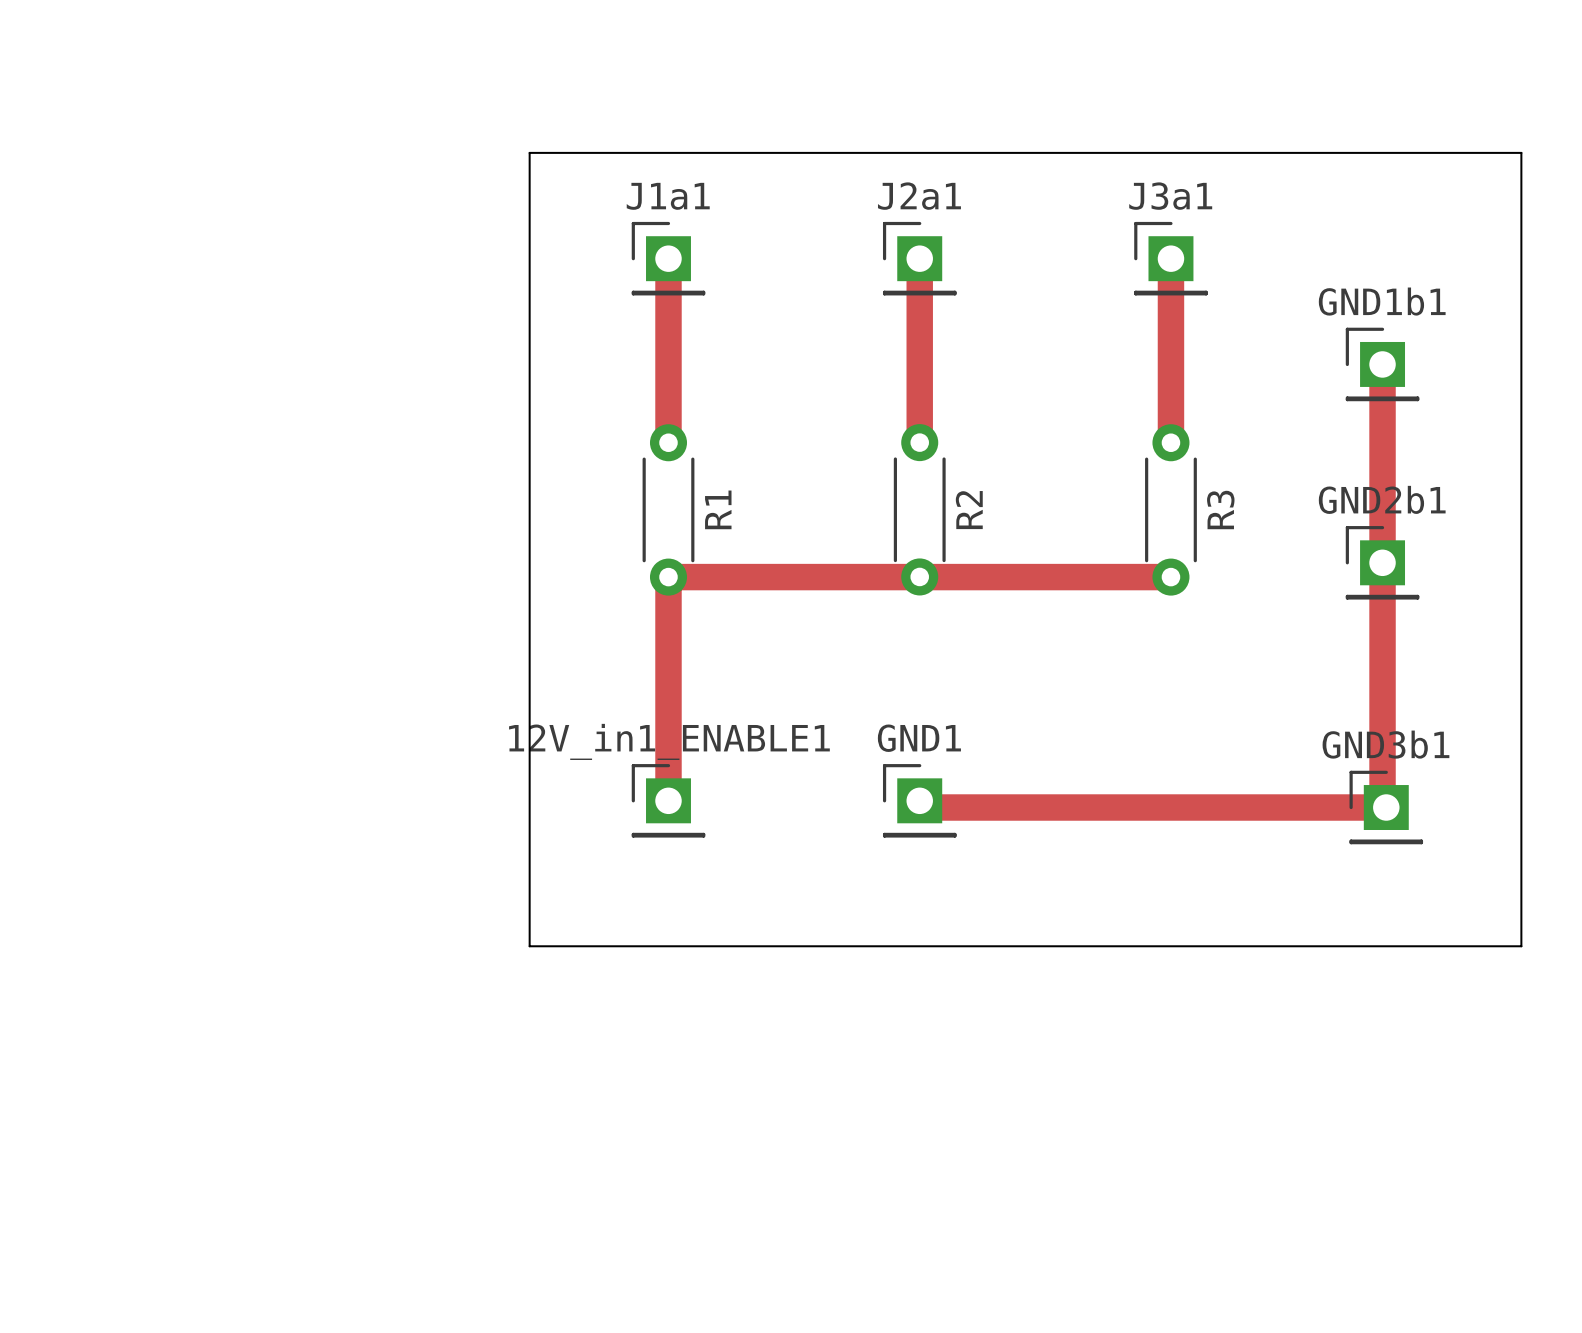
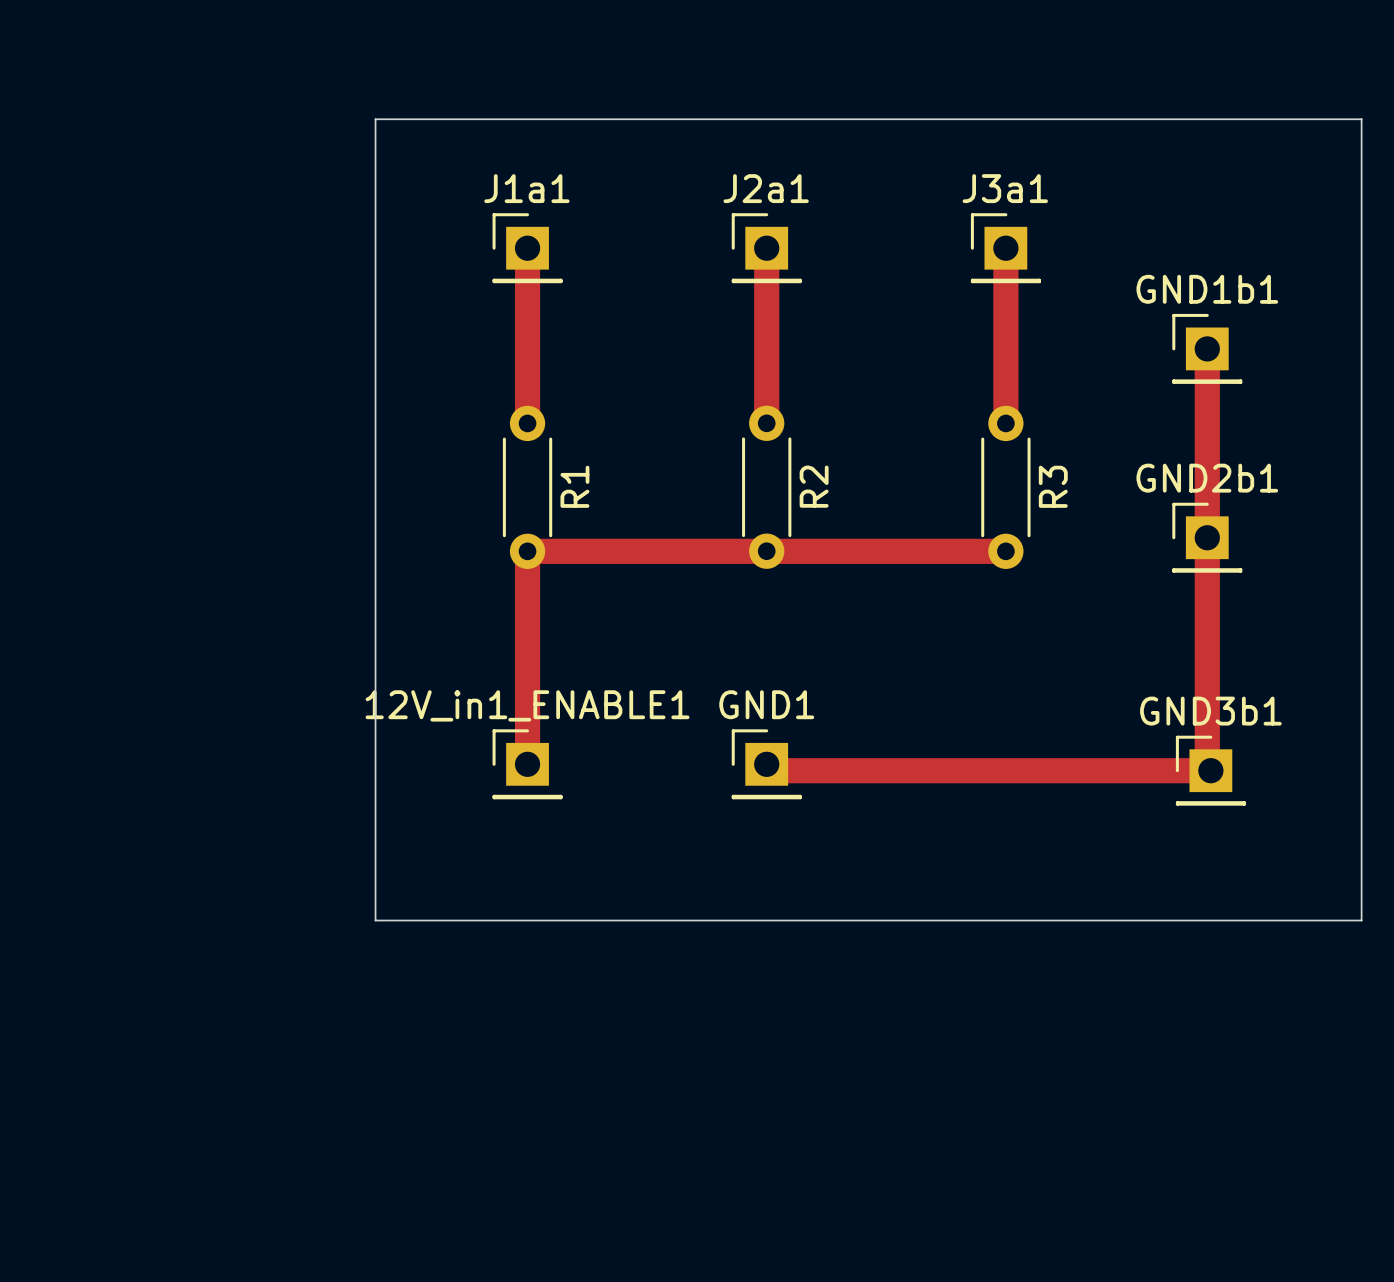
board edge: (529, 152) (1521, 152) (1521, 946) (529, 946) (529, 152) -> (375, 119) (375, 920) (1361, 920) (1361, 119) (375, 119)

